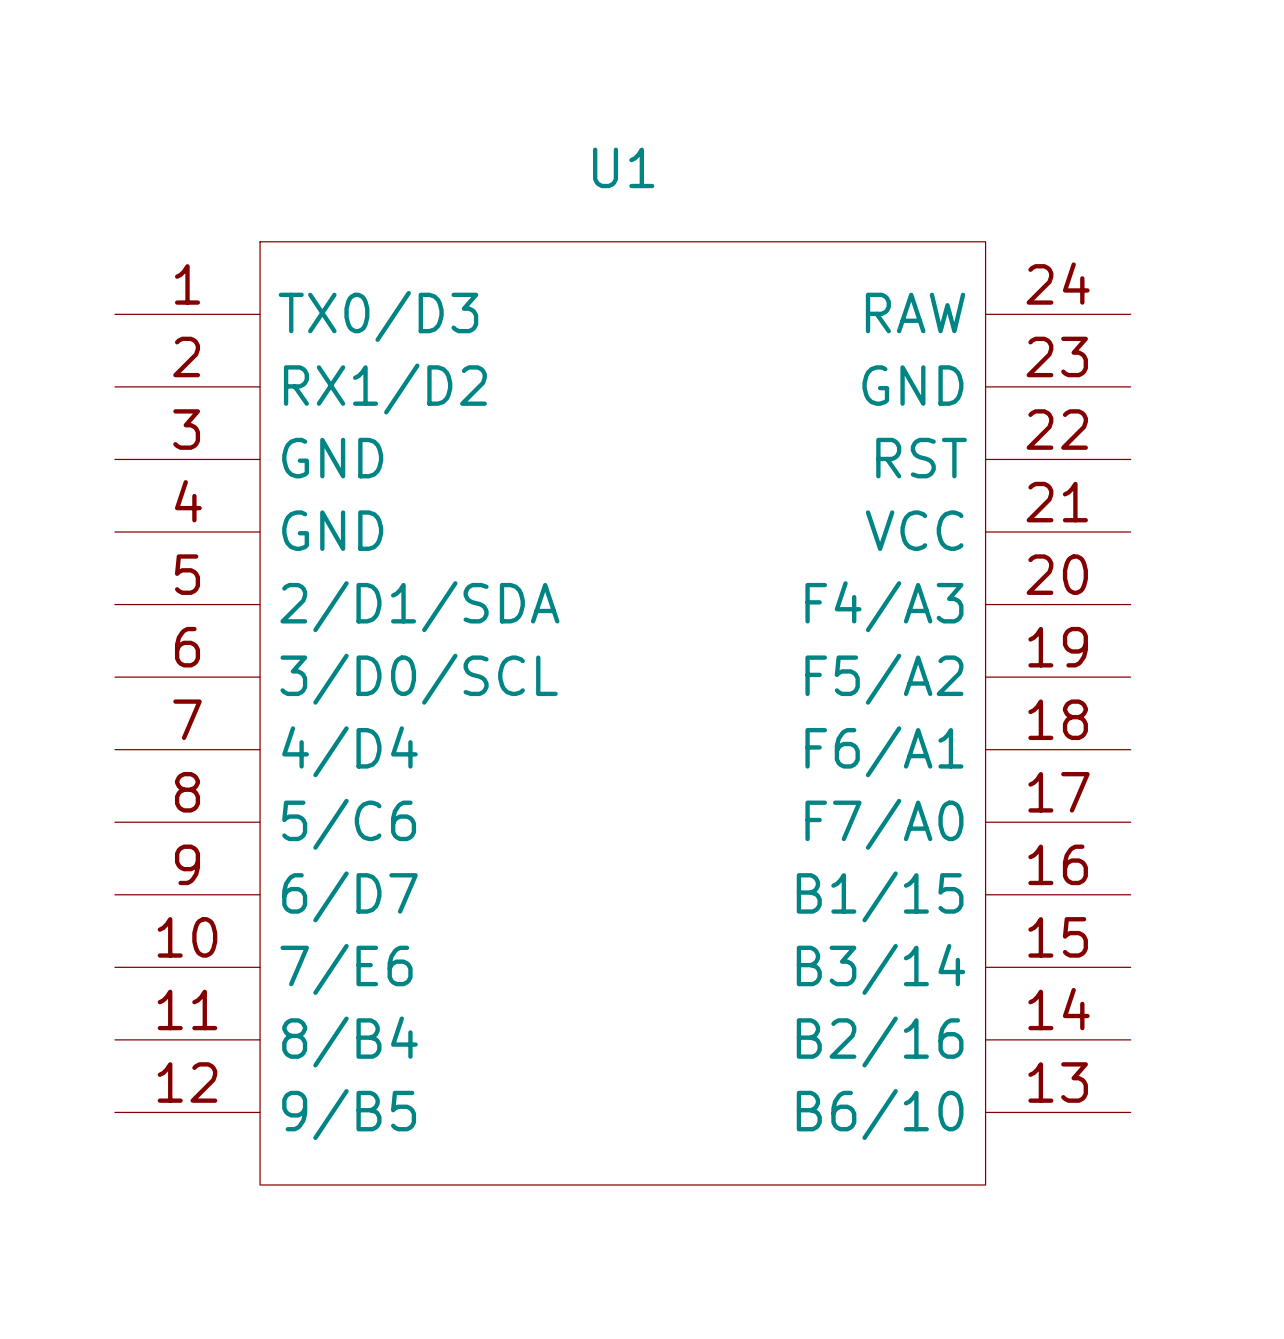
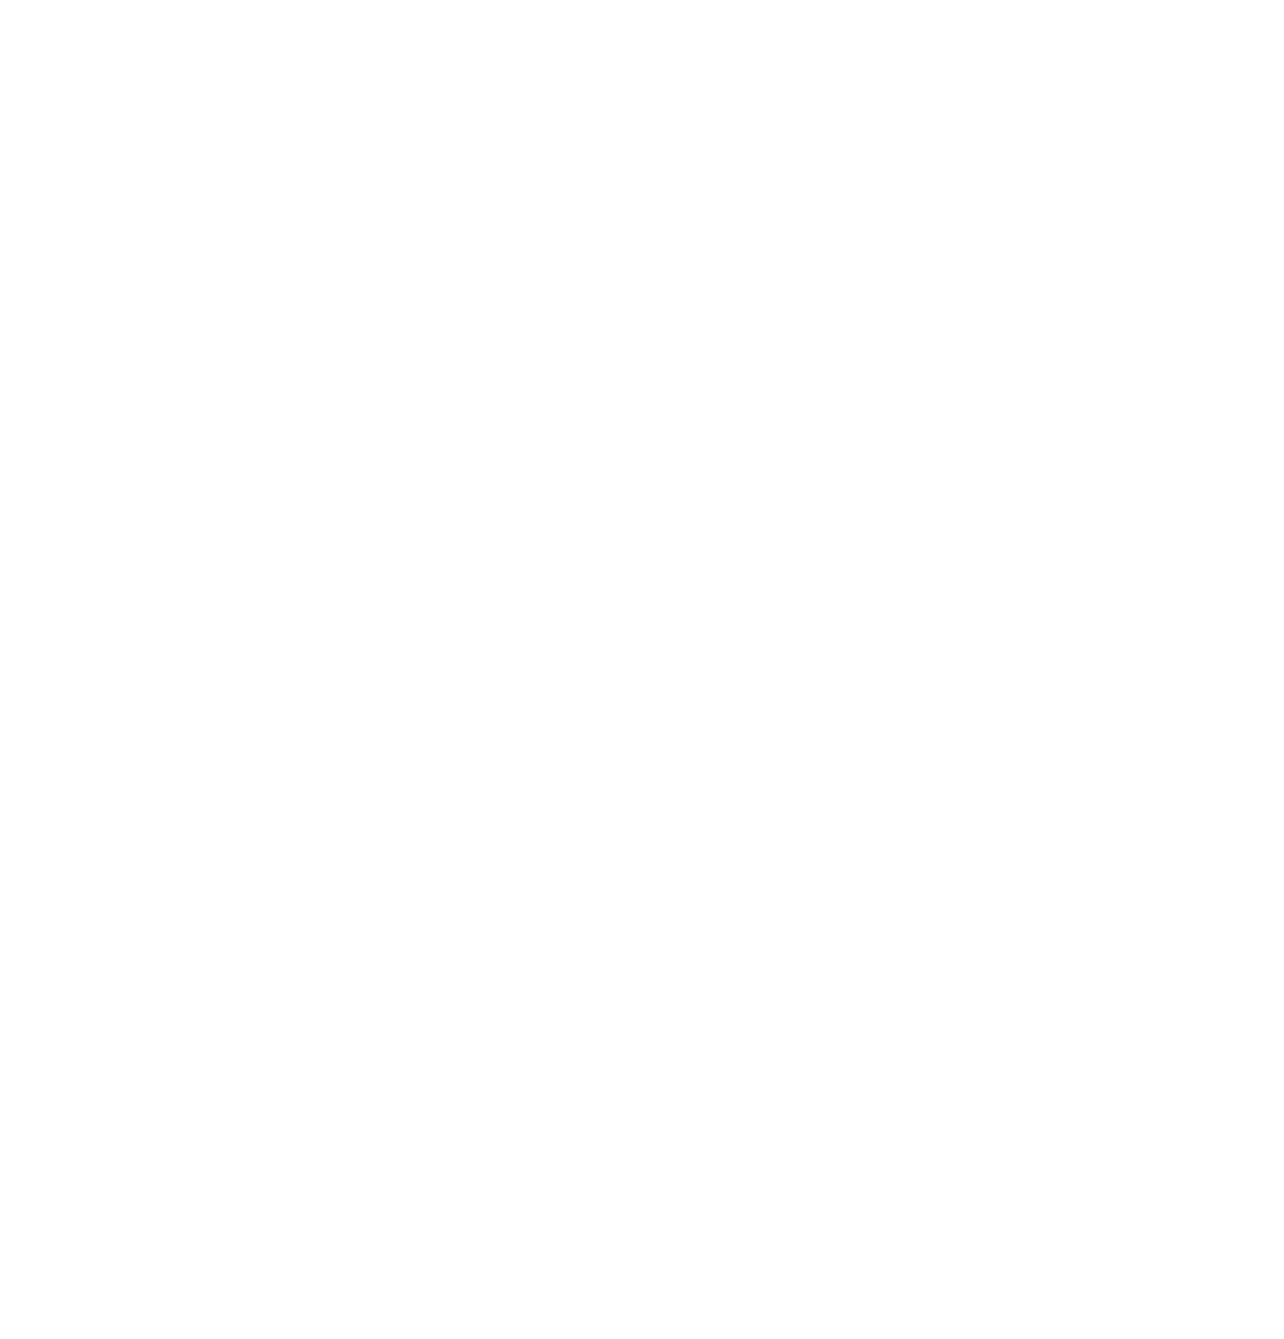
U1: (622, 713) -> none

